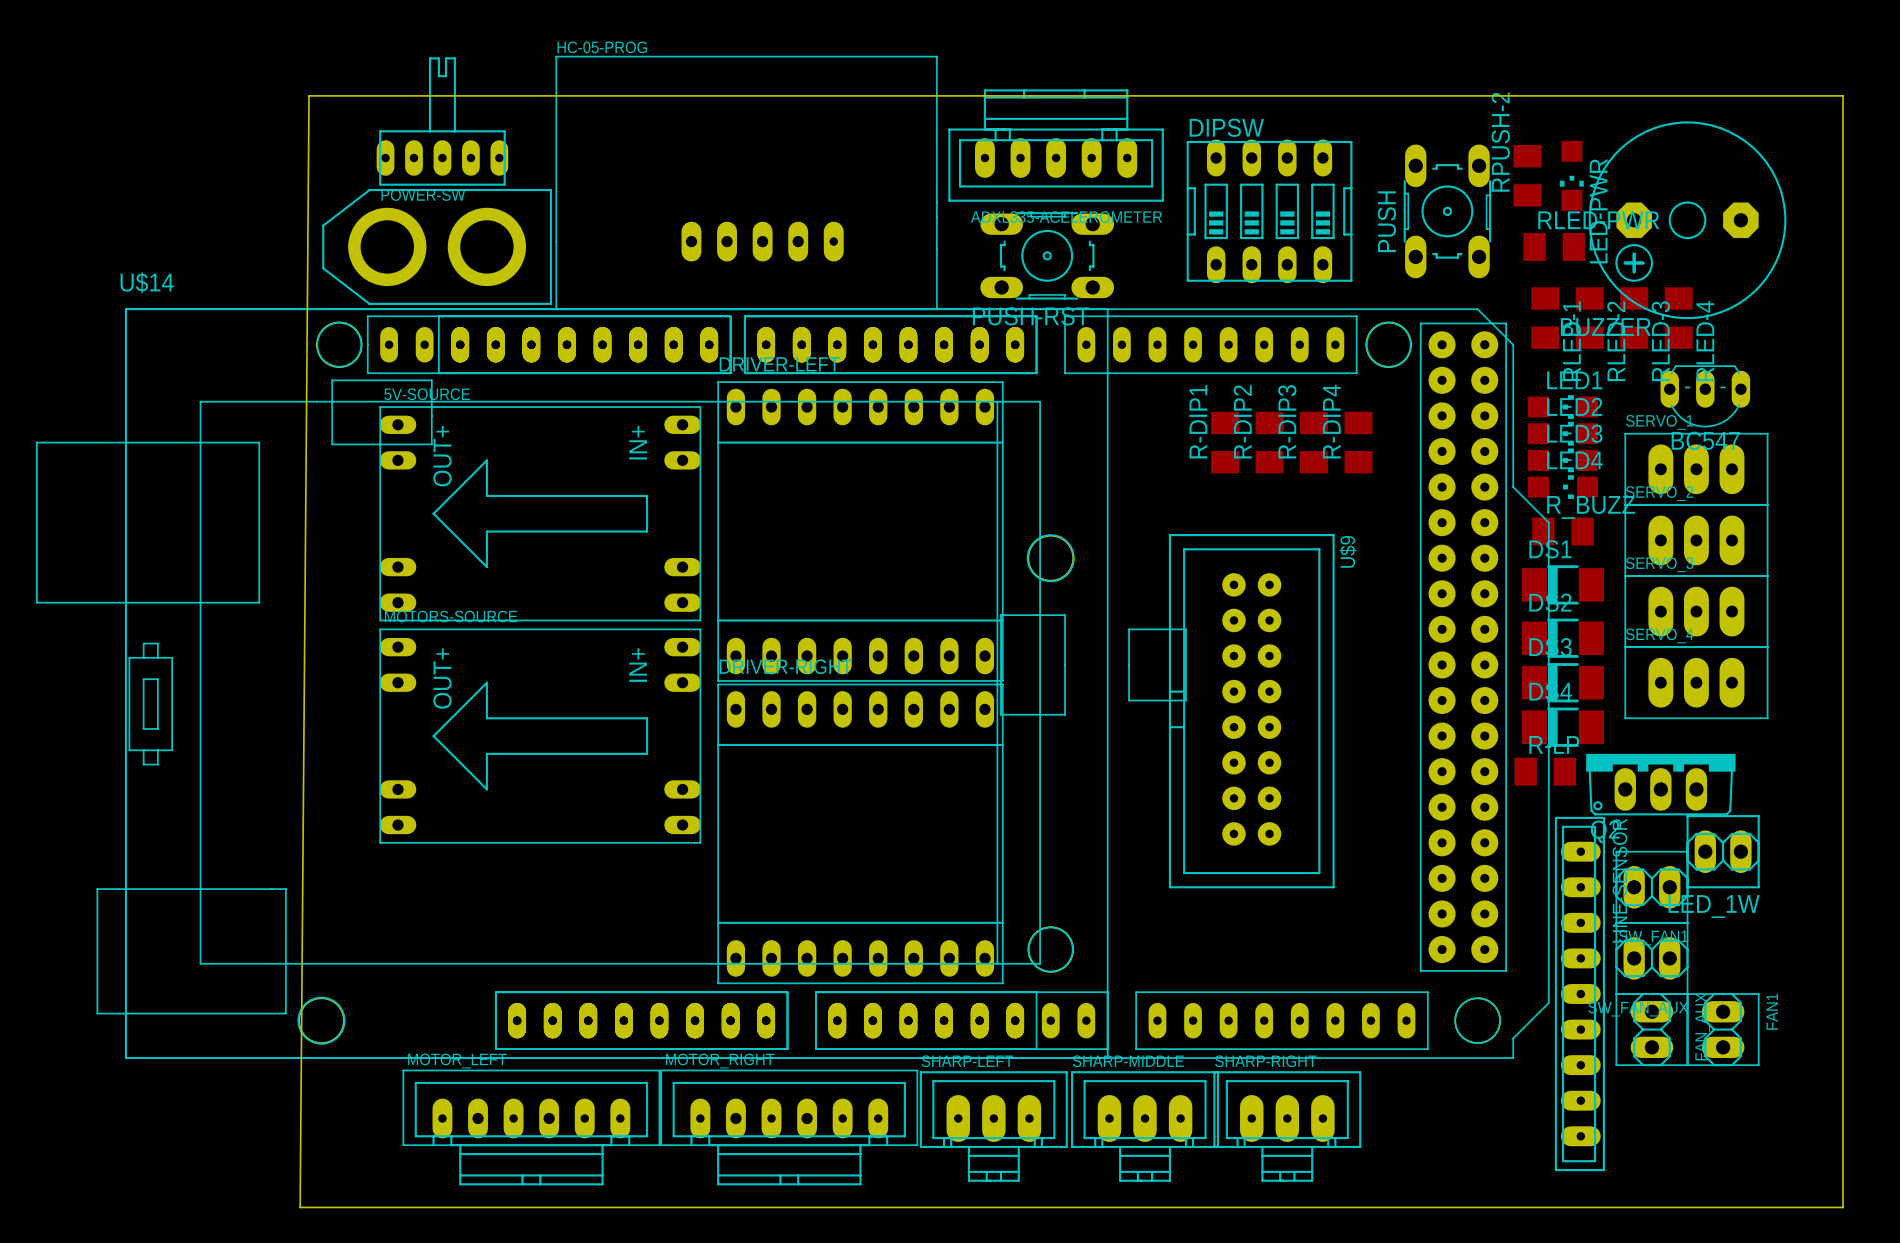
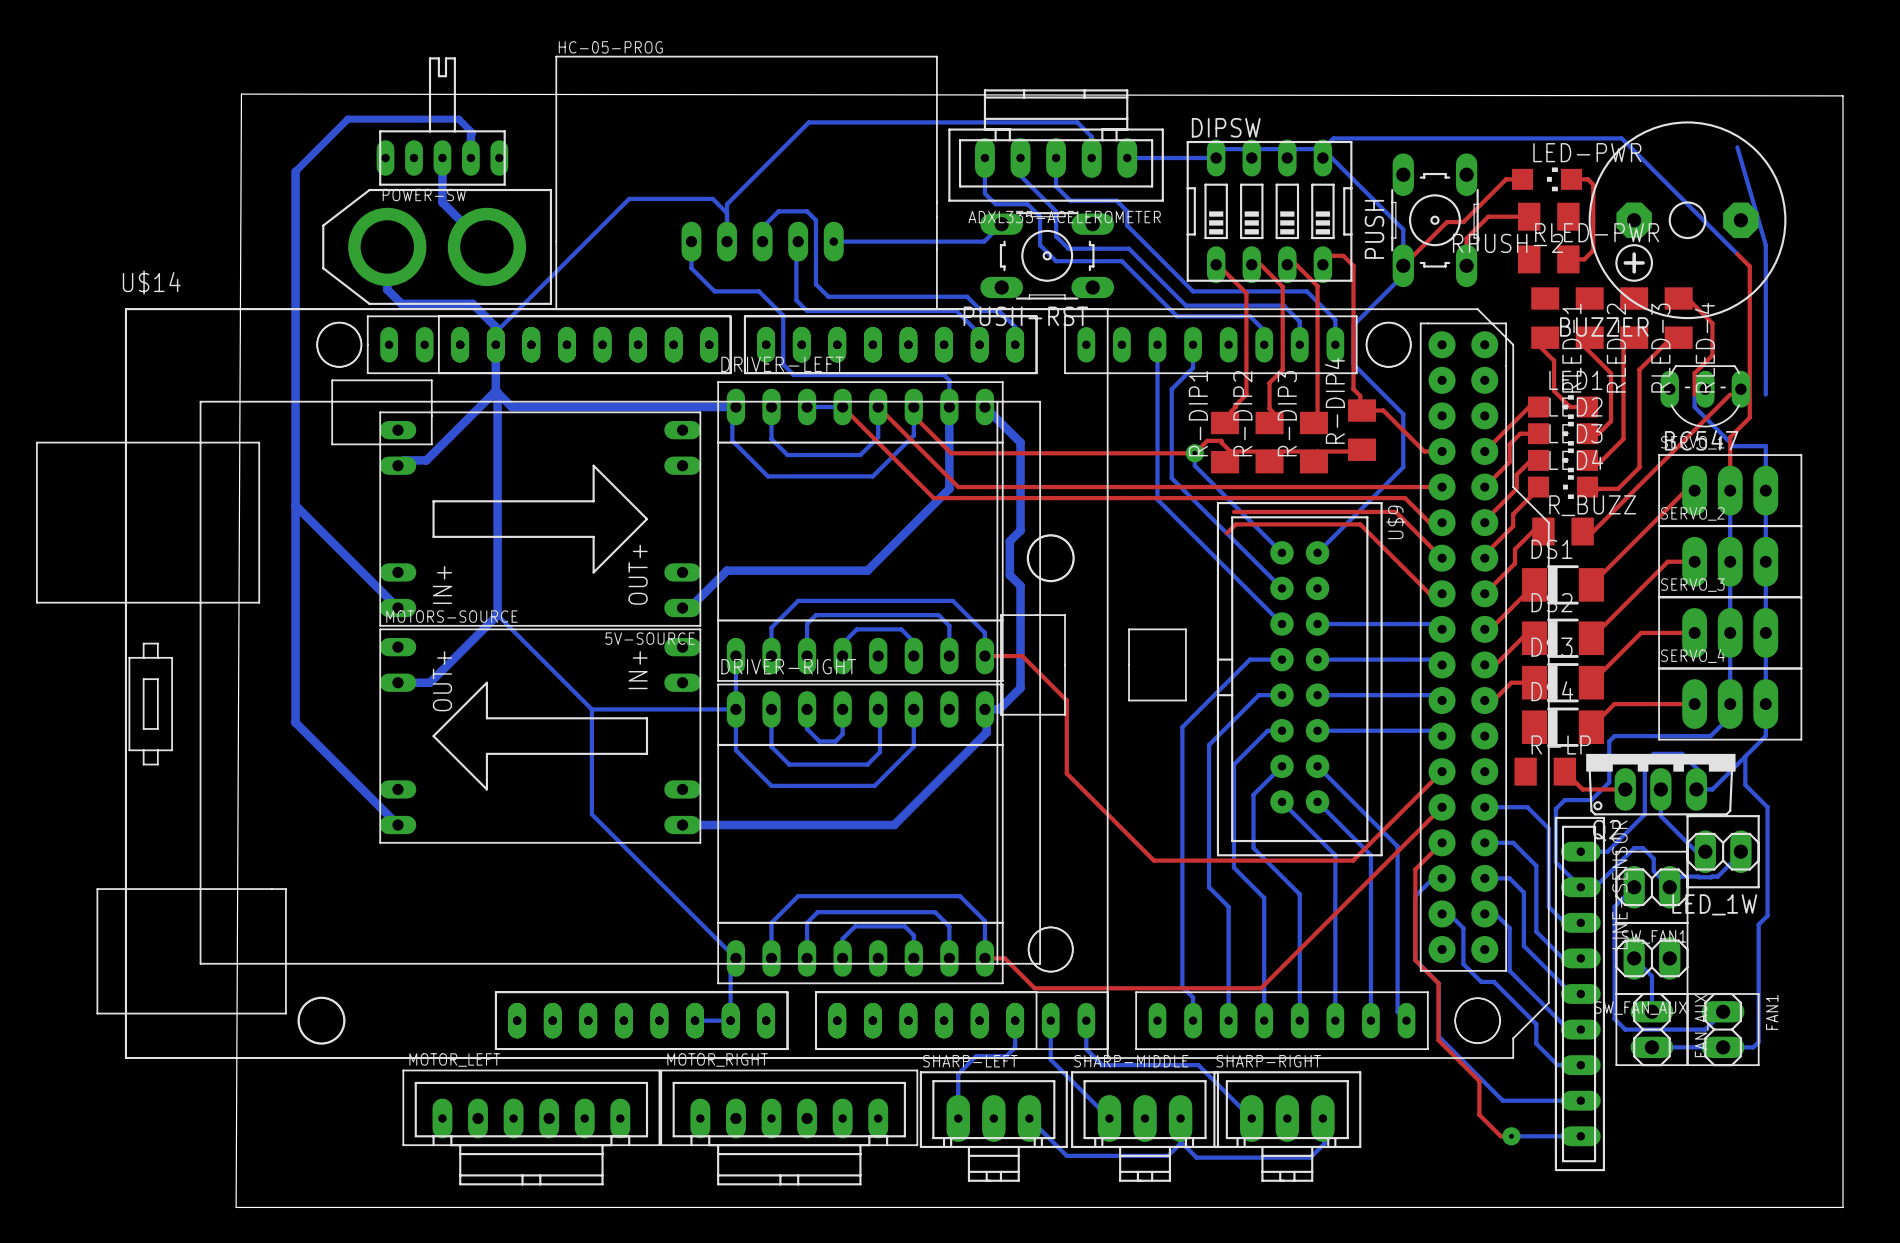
board edge: (1842, 95) (309, 95) (300, 1207) -> (1842, 95) (241, 94) (236, 1207) (300, 1207)
RPUSH-2 name position: RPUSH-2 (1500, 142) -> RPUSH-2 (1508, 243)
bottom track: none -> (1737, 147) (1765, 245) (1765, 394)
bottom track: none -> (1322, 149) (1216, 149) (1207, 158) (1127, 158)
bottom track: none -> (1322, 149) (1403, 229) (1403, 275) (1353, 325) (1353, 364) (1403, 414) (1403, 467) (1317, 552)
bottom track: none -> (1322, 149) (1333, 138) (1621, 138) (1737, 254)
bottom track: none -> (442, 158) (442, 202) (486, 246)
bottom track: none -> (470, 158) (470, 134) (472, 133) (458, 119) (347, 119) (295, 171) (295, 722) (397, 825)
bottom track: none -> (984, 158) (984, 193) (995, 204) (1027, 204) (1040, 216) (1040, 245) (1056, 261) (1121, 261) (1177, 316) (1249, 316) (1264, 330) (1264, 344)
bottom track: none -> (1020, 158) (1020, 175) (1056, 211) (1056, 236) (1068, 248) (1129, 248) (1185, 305) (1283, 305) (1299, 321) (1299, 344)
bottom track: none -> (1056, 158) (1056, 186) (1070, 200) (1116, 200) (1127, 211) (1127, 225) (1193, 291) (1306, 291) (1335, 319) (1335, 344)
bottom track: none -> (1091, 158) (1091, 136) (1077, 122) (808, 122) (727, 204) (727, 241)
RPUSH-2 rotation: 0° (1527, 175) -> 90° clockwise (1548, 216)
RPUSH-2 position: (1527, 175) -> (1548, 216)
LED-PWR rotation: 0° (1571, 175) -> 90° counterclockwise (1547, 179)
top track: none -> (1522, 179) (1506, 179) (1463, 222) (1447, 222) (1403, 265)
top track: none -> (1571, 179) (1587, 179) (1593, 184) (1593, 250) (1584, 259) (1568, 259)
PUSH position: (1447, 211) -> (1434, 220)
bottom track: none -> (727, 213) (712, 198) (629, 198) (495, 332)
top track: none -> (1529, 216) (1488, 216) (1466, 238) (1466, 265)
bottom track: none -> (1001, 224) (984, 241) (833, 241)
bottom track: none -> (691, 241) (691, 268) (714, 291) (759, 291) (783, 315) (783, 364) (793, 375) (944, 375) (949, 380) (949, 488) (867, 570) (727, 570) (689, 608) (682, 608)
bottom track: none -> (762, 241) (760, 239) (760, 229) (778, 211) (807, 211) (815, 220) (815, 284) (828, 296) (967, 296) (981, 310) (999, 310) (1015, 326) (1015, 344)
bottom track: none -> (798, 241) (796, 243) (796, 300) (807, 310) (956, 310) (979, 334) (979, 344)
bottom track: none -> (387, 246) (387, 289) (401, 303) (472, 303) (495, 326) (495, 391)
RLED-PWR position: (1554, 246) -> (1548, 259)
top track: none -> (1737, 254) (1749, 266) (1749, 417) (1730, 437) (1730, 490)
top track: none -> (1216, 255) (1216, 262) (1246, 293) (1246, 394) (1230, 412)
top track: none -> (1251, 255) (1282, 286) (1282, 369) (1269, 382) (1269, 408) (1273, 412)
top track: none -> (1287, 255) (1317, 286) (1317, 412)
top track: none -> (1322, 255) (1343, 255) (1353, 265) (1353, 389) (1360, 396) (1360, 408) (1362, 410) (1383, 410) (1424, 451) (1442, 451)
top track: none -> (1668, 302) (1691, 302) (1712, 323) (1712, 355) (1694, 373) (1694, 394)
top track: none -> (1534, 341) (1554, 360) (1554, 391) (1570, 407) (1587, 407)
top track: none -> (1579, 341) (1611, 373) (1611, 421) (1598, 433) (1587, 433)
top track: none -> (1623, 341) (1623, 439) (1598, 463) (1595, 460) (1587, 460)
top track: none -> (1667, 341) (1639, 369) (1639, 467) (1618, 488) (1598, 488) (1592, 492) (1587, 487)
bottom track: none -> (1157, 344) (1157, 499) (1281, 624)
bottom track: none -> (1193, 344) (1193, 367) (1171, 389) (1171, 478) (1281, 588)
bottom track: none -> (495, 391) (426, 460) (403, 460)
bottom track: none -> (495, 391) (511, 407) (735, 407)
bottom track: none -> (497, 392) (497, 615)
5V-SOURCE name position: 5V-SOURCE (427, 394) -> 5V-SOURCE (650, 638)
bottom track: none -> (1694, 394) (1694, 407) (1733, 446) (1765, 446) (1765, 736) (1712, 789) (1696, 789)
top track: none -> (1730, 394) (1593, 531) (1582, 531)
5V-SOURCE footprint: [379, 406, 702, 622] -> [379, 411, 702, 627]
bottom track: none -> (732, 407) (732, 440) (767, 476) (872, 476) (913, 435) (913, 407)
bottom track: none -> (771, 407) (771, 439) (787, 455) (860, 455) (878, 437) (878, 407)
bottom track: none -> (807, 407) (842, 407)
top track: none -> (842, 407) (933, 498) (1405, 498) (1429, 522) (1442, 522)
top track: none -> (878, 407) (958, 487) (1442, 487)
top track: none -> (913, 407) (913, 415) (951, 453) (1194, 453) (1207, 440) (1221, 440) (1230, 451) (1360, 451) (1362, 449)
bottom track: none -> (984, 407) (1020, 442) (1020, 530) (1009, 541) (1009, 575) (1020, 585) (1020, 688) (999, 709) (984, 709) (986, 711) (986, 732) (894, 825) (682, 825)
top track: none -> (1538, 407) (1529, 407) (1484, 451)
top track: none -> (1538, 433) (1520, 433) (1509, 444) (1509, 462) (1484, 487)
R-DIP4 position: (1358, 442) -> (1362, 430)
bottom track: none -> (1194, 453) (1194, 465) (1281, 552)
via: none -> (1194, 453)
top track: none -> (1538, 460) (1531, 460) (1516, 474) (1516, 488) (1484, 522)
SERVO_1 position: (1696, 469) -> (1730, 490)
top track: none -> (1538, 487) (1513, 514) (1513, 526) (1484, 554) (1484, 558)
top track: none -> (1694, 490) (1685, 490) (1591, 584)
bottom track: none -> (1730, 490) (1730, 716) (1710, 736) (1614, 736) (1609, 741) (1609, 782) (1591, 800) (1564, 800) (1555, 809) (1555, 862) (1580, 887) (1595, 887) (1634, 848) (1643, 848) (1653, 858) (1653, 871) (1669, 887) (1680, 876) (1717, 876) (1740, 851)
bottom track: none -> (295, 505) (397, 608)
top track: none -> (1233, 511) (1395, 511) (1442, 558)
top track: none -> (1543, 531) (1532, 531) (1515, 549) (1515, 563) (1484, 593)
top track: none -> (1226, 533) (1235, 524) (1360, 524) (1429, 593) (1442, 593)
SERVO_2 position: (1696, 540) -> (1730, 561)
top track: none -> (1694, 561) (1667, 561) (1591, 638)
top track: none -> (1534, 584) (1490, 629) (1484, 629)
SERVO_3 position: (1696, 611) -> (1730, 632)
bottom track: none -> (497, 615) (430, 682) (397, 682)
bottom track: none -> (497, 615) (591, 709)
bottom track: none -> (1317, 624) (1436, 624) (1442, 629)
top track: none -> (1694, 632) (1641, 632) (1591, 682)
top track: none -> (1534, 638) (1523, 636) (1495, 664) (1484, 664)
bottom track: none -> (735, 656) (735, 750) (771, 785) (874, 785) (913, 746) (913, 709)
bottom track: none -> (771, 656) (771, 627) (798, 600) (952, 600) (984, 632) (984, 656)
bottom track: none -> (807, 656) (807, 624) (815, 615) (938, 615) (949, 625) (949, 656)
bottom track: none -> (842, 656) (842, 643) (856, 629) (901, 629) (913, 641) (913, 656)
top track: none -> (984, 656) (1022, 656) (1066, 700) (1066, 773) (1153, 860) (1353, 860) (1442, 771)
bottom track: none -> (1281, 659) (1249, 659) (1182, 727) (1182, 986) (1193, 997) (1193, 1020)
bottom track: none -> (1317, 659) (1436, 659) (1442, 664)
top track: none -> (1534, 682) (1511, 682) (1493, 700) (1484, 700)
SERVO_4 position: (1696, 682) -> (1730, 704)
bottom track: none -> (1281, 695) (1258, 695) (1209, 744) (1209, 887) (1228, 906) (1228, 1020)
bottom track: none -> (1317, 695) (1436, 695) (1442, 700)
top track: none -> (1694, 704) (1614, 704) (1591, 727)
bottom track: none -> (591, 709) (735, 709)
bottom track: none -> (591, 709) (591, 814) (735, 958) (730, 963) (730, 1020) (695, 1020)
bottom track: none -> (771, 709) (771, 746) (789, 764) (867, 764) (880, 752) (880, 711) (878, 709)
bottom track: none -> (807, 709) (807, 728) (819, 741) (835, 741) (842, 734) (842, 709)
U$9 position: (1251, 711) -> (1299, 679)
bottom track: none -> (1281, 730) (1267, 730) (1233, 764) (1233, 867) (1264, 897) (1264, 1020)
bottom track: none -> (1317, 730) (1436, 730) (1442, 736)
bottom track: none -> (1745, 756) (1745, 785) (1767, 807) (1767, 915) (1758, 924) (1758, 1042) (1753, 1047) (1651, 1047)
bottom track: none -> (1281, 766) (1253, 794) (1253, 848) (1299, 894) (1299, 1020)
bottom track: none -> (1317, 766) (1397, 846) (1397, 1011) (1406, 1020)
top track: none -> (1564, 771) (1582, 789) (1625, 789)
bottom track: none -> (1660, 789) (1660, 816) (1696, 851) (1705, 851)
bottom track: none -> (1698, 789) (1698, 769) (1682, 753) (1653, 753) (1644, 762) (1644, 814) (1607, 851) (1580, 851)
bottom track: none -> (1281, 801) (1335, 855) (1335, 1020)
bottom track: none -> (1317, 801) (1370, 855) (1370, 1020)
top track: none -> (1442, 807) (1261, 988) (1034, 988) (1004, 958) (984, 958)
bottom track: none -> (1484, 807) (1527, 807) (1548, 828) (1548, 906) (1564, 922) (1580, 922)
top track: none -> (1442, 842) (1415, 869) (1415, 960) (1438, 983) (1438, 1040) (1479, 1081) (1479, 1114) (1500, 1136) (1511, 1136)
bottom track: none -> (1484, 842) (1513, 842) (1536, 865) (1536, 931) (1563, 958) (1580, 958)
bottom track: none -> (1442, 878) (1433, 878) (1415, 896) (1415, 960) (1438, 983) (1438, 1036) (1502, 1100) (1580, 1100)
bottom track: none -> (1484, 878) (1509, 878) (1523, 892) (1523, 945) (1571, 993) (1580, 993)
bottom track: none -> (1634, 887) (1614, 906) (1614, 1018) (1625, 1029) (1705, 1029) (1723, 1011)
bottom track: none -> (1442, 913) (1449, 913) (1463, 928) (1463, 964) (1481, 981) (1494, 981) (1536, 1024) (1536, 1043) (1557, 1065) (1580, 1065)
bottom track: none -> (1484, 913) (1495, 913) (1509, 928) (1509, 970) (1568, 1029) (1580, 1029)
bottom track: none -> (771, 958) (771, 922) (798, 896) (960, 896) (984, 921) (984, 958)
bottom track: none -> (807, 958) (807, 922) (817, 912) (935, 912) (949, 926) (949, 958)
bottom track: none -> (842, 958) (842, 938) (855, 926) (904, 926) (913, 935) (913, 961)
bottom track: none -> (1634, 958) (1651, 976) (1651, 1011)
bottom track: none -> (1015, 1020) (1015, 1047) (1006, 1056) (976, 1056) (958, 1074) (958, 1118)
bottom track: none -> (1050, 1020) (1050, 1059) (1109, 1118)
bottom track: none -> (1086, 1020) (1086, 1049) (1102, 1065) (1198, 1065) (1251, 1118)
bottom track: none -> (1029, 1118) (1066, 1155) (1168, 1155) (1180, 1143) (1180, 1118)
bottom track: none -> (1322, 1118) (1324, 1120) (1324, 1143) (1310, 1157) (1196, 1157) (1180, 1141)
bottom track: none -> (1511, 1136) (1580, 1136)
via: none -> (1511, 1136)

